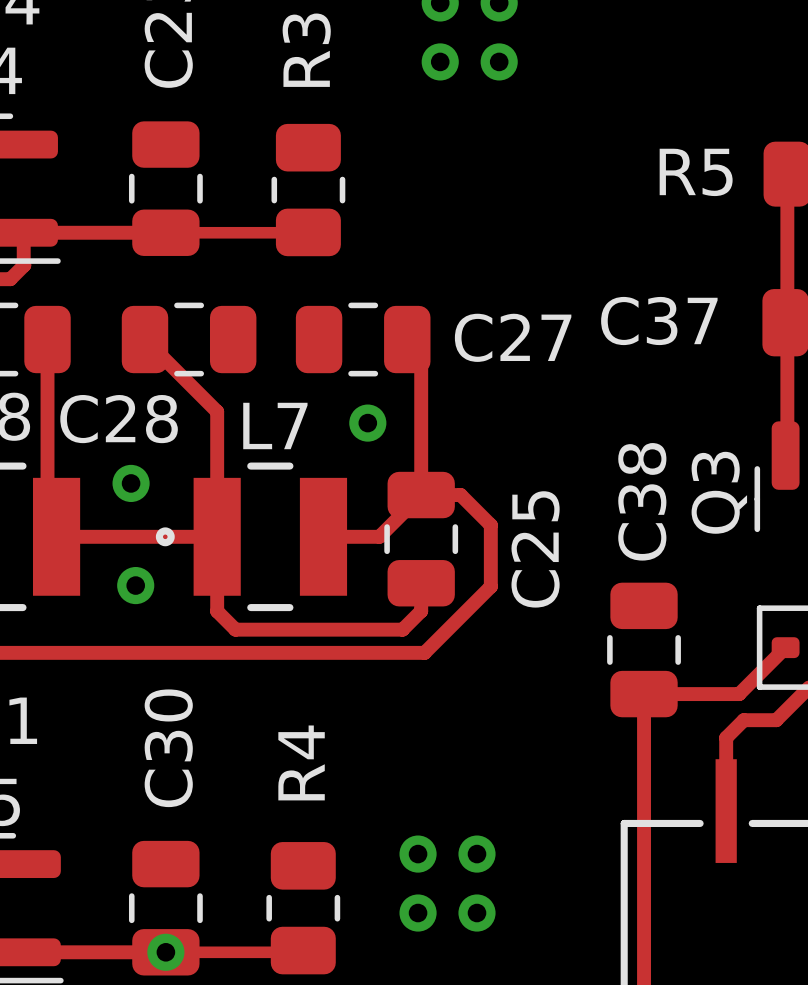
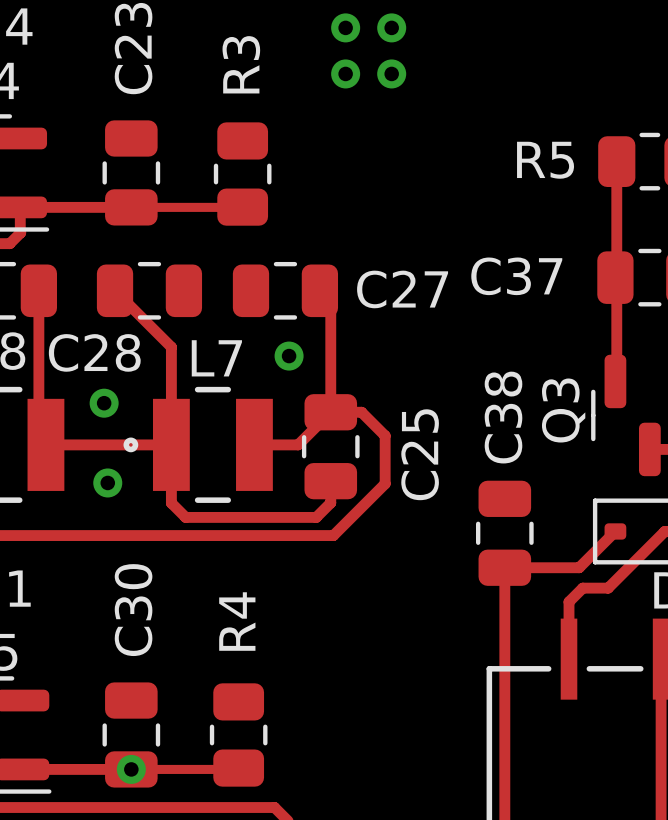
via: (418, 854) -> none
via: (477, 854) -> none
via: (418, 913) -> none
via: (477, 913) -> none

